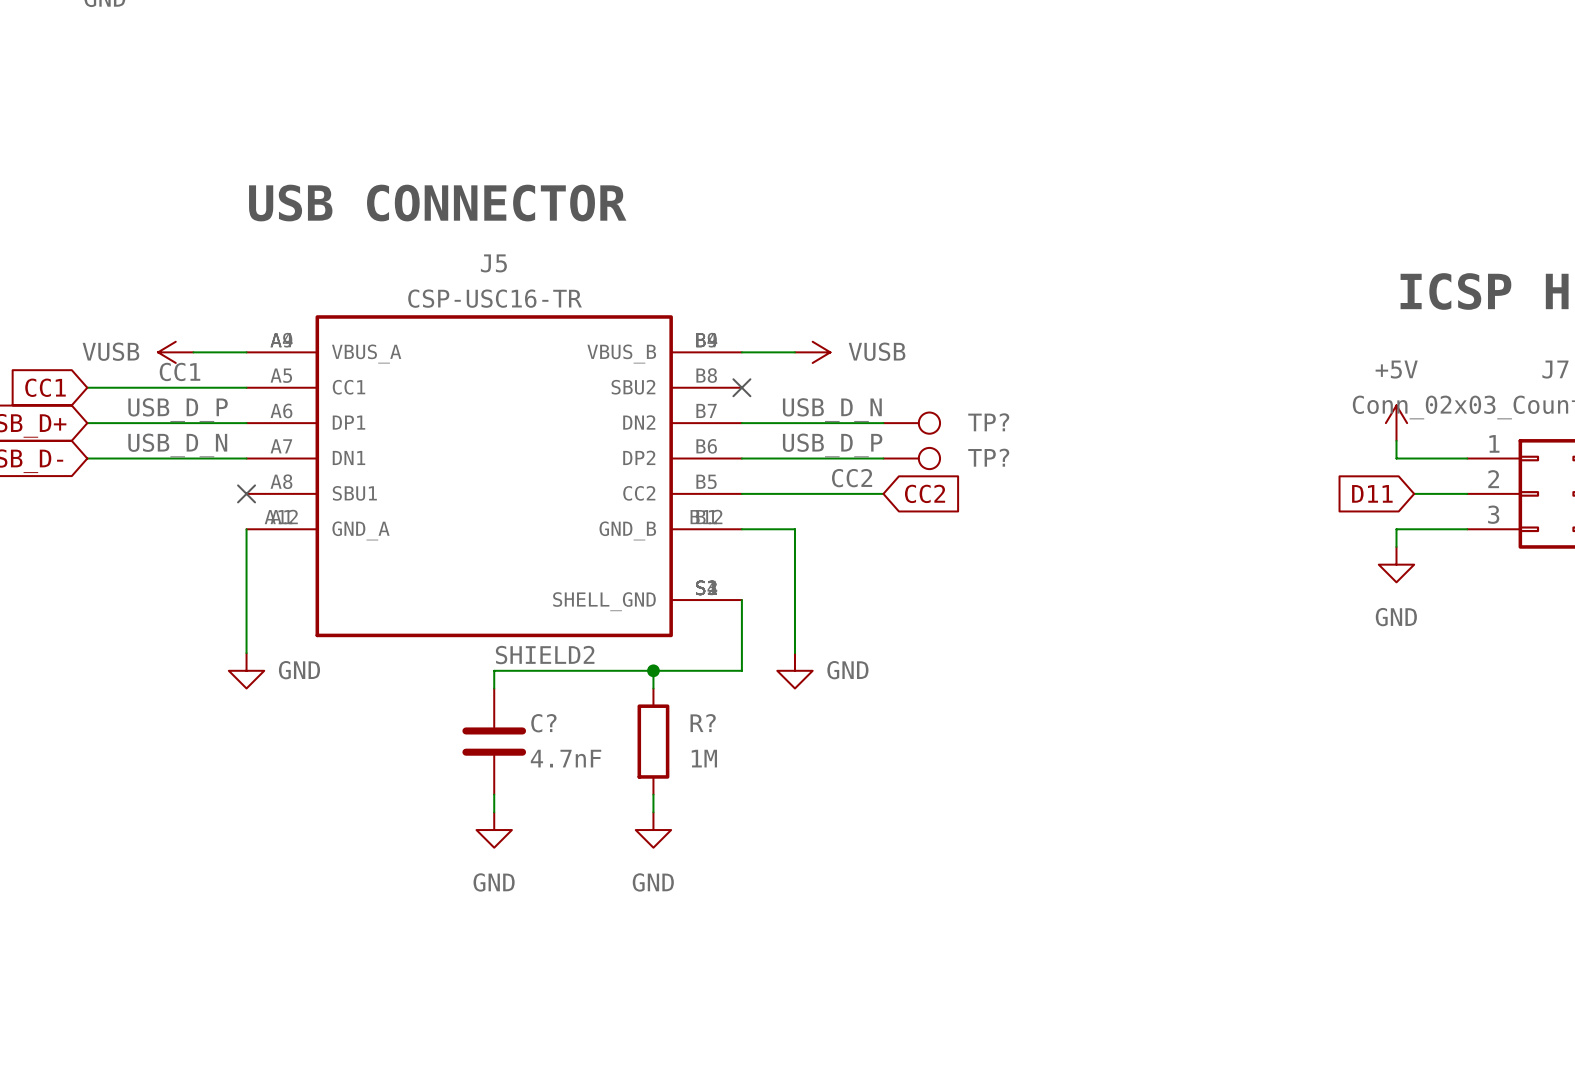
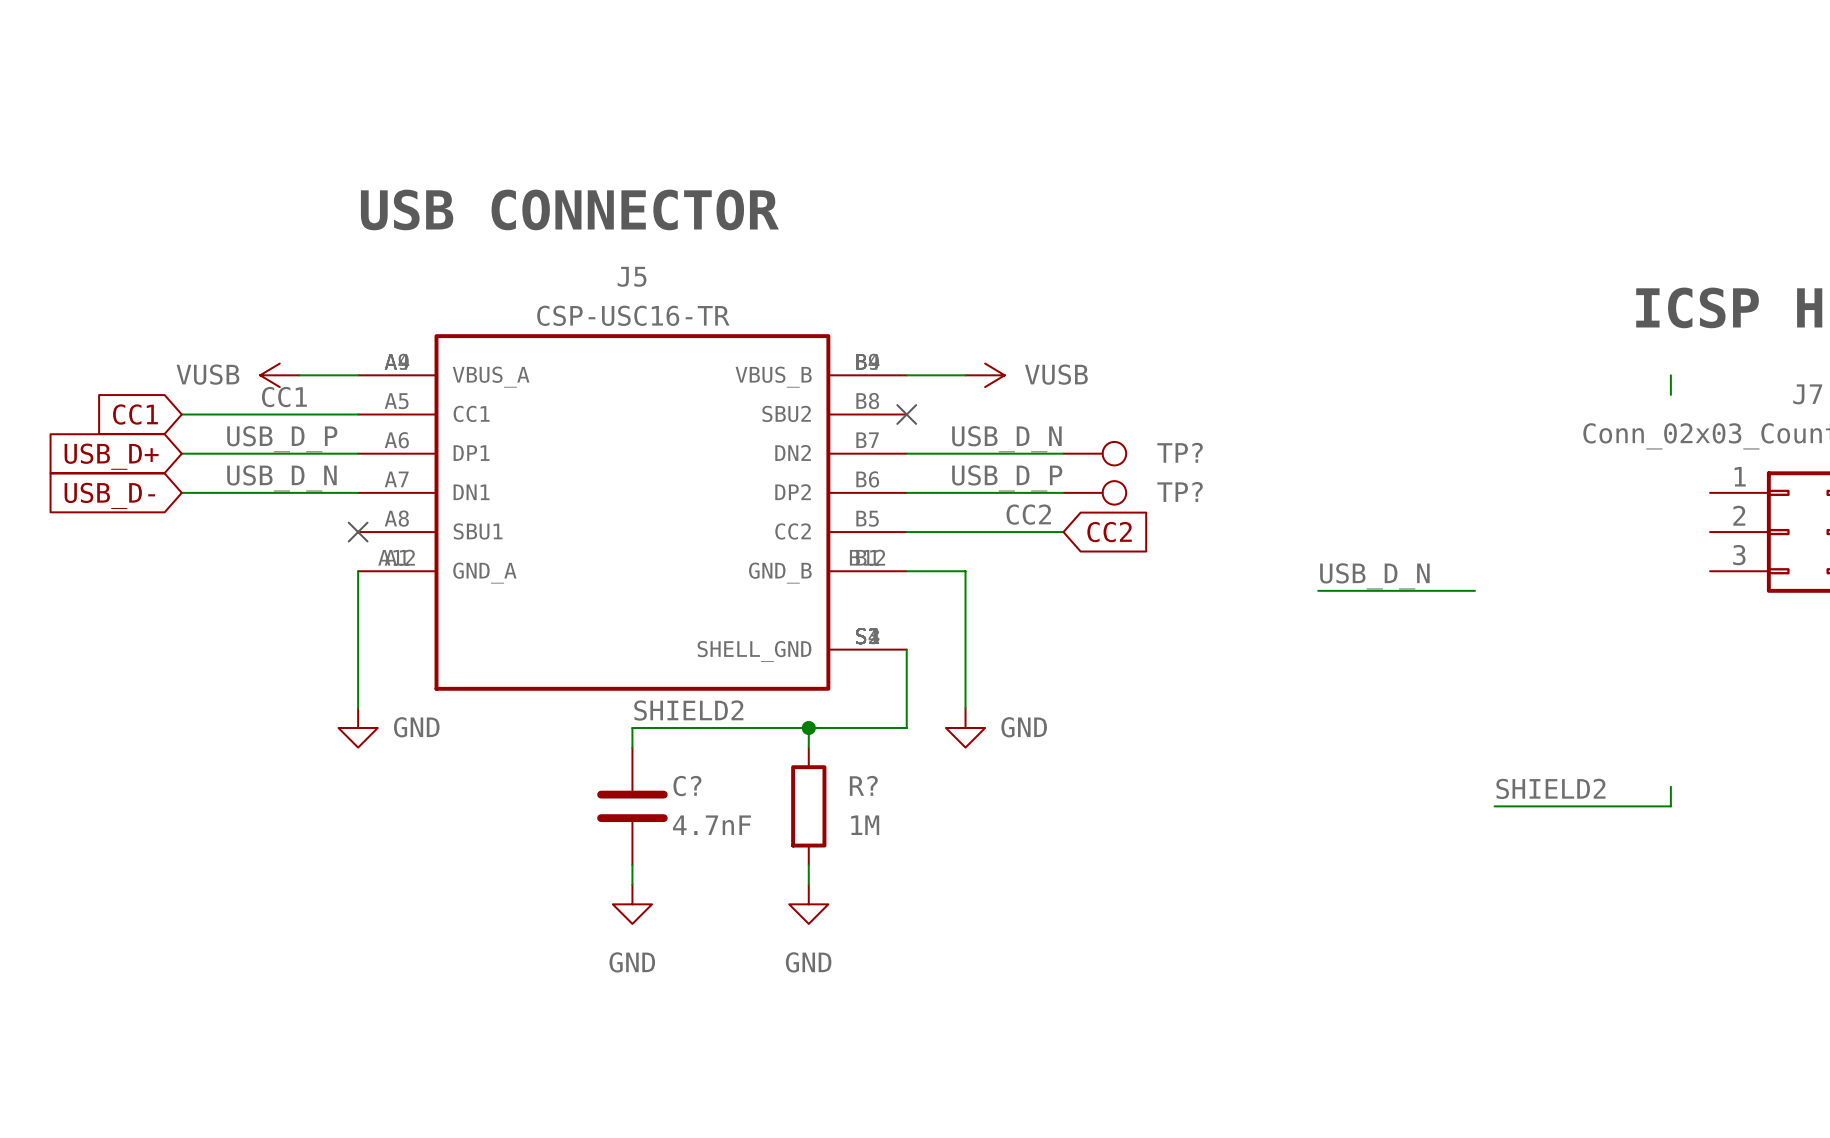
wire: none -> (1670, 375) (1670, 394)
power symbol: +5V (1396, 423) -> none
wire: (1396, 440) (1396, 458) (1467, 458) -> none
global label: D11 (1372, 493) -> none
wire: (1414, 493) (1467, 493) -> none
wire: (1467, 529) (1396, 529) (1396, 546) -> none
label: none -> USB_D_N (1374, 576)
wire: none -> (1318, 590) (1474, 590)
power symbol: GND (1396, 564) -> none
wire: none -> (1670, 786) (1670, 806) (1494, 806)
label: none -> SHIELD2 (1550, 788)

